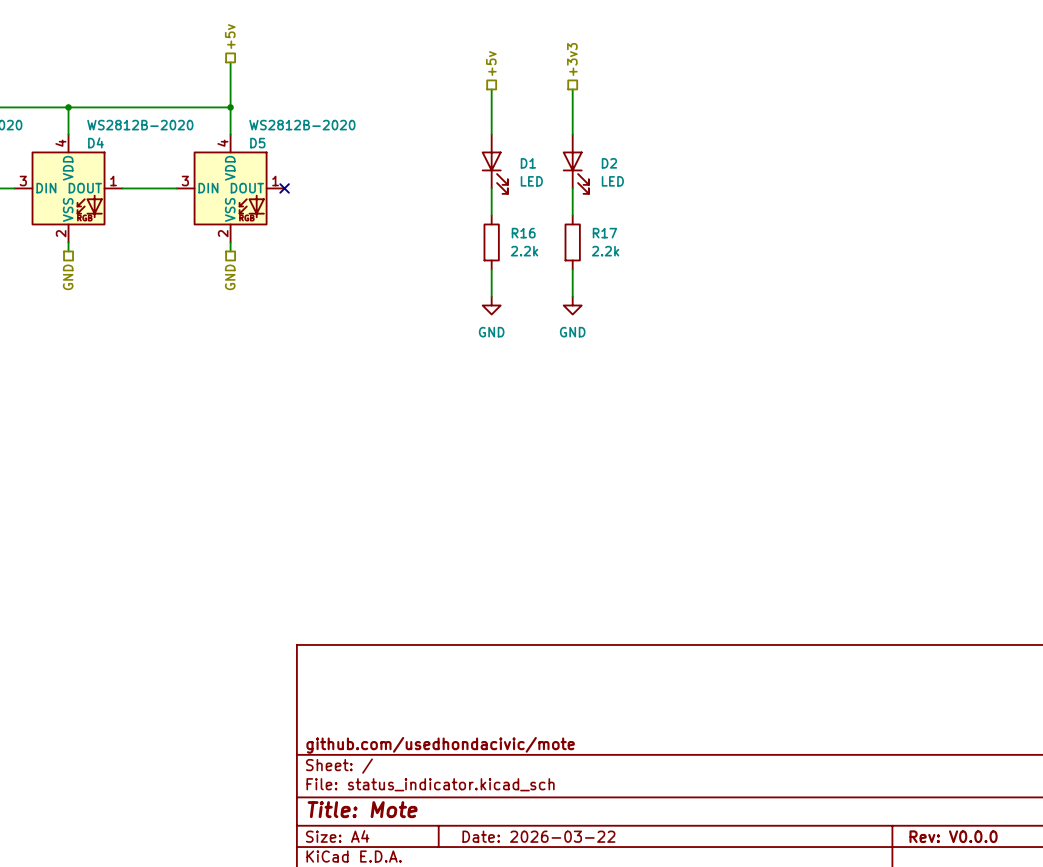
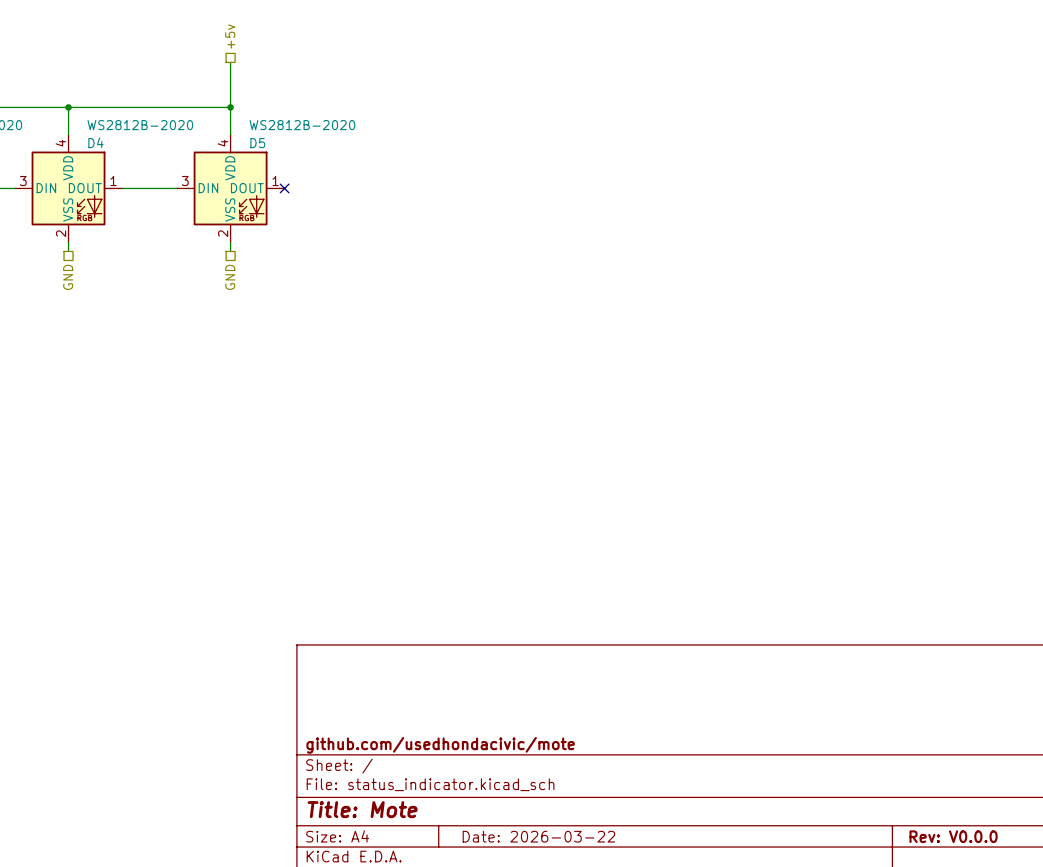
hierarchical label: +3v3 (572, 59) -> none
hierarchical label: +5v (491, 63) -> none
wire: (491, 89) (491, 134) -> none
wire: (572, 89) (572, 134) -> none
D1: LED (494, 164) -> none
D2: LED (575, 164) -> none
wire: (491, 188) (491, 215) -> none
wire: (572, 188) (572, 215) -> none
R16: 2.2k (491, 242) -> none
R17: 2.2k (572, 242) -> none
wire: (491, 269) (491, 296) -> none
wire: (572, 269) (572, 296) -> none
power symbol: GND (491, 305) -> none
power symbol: GND (572, 305) -> none

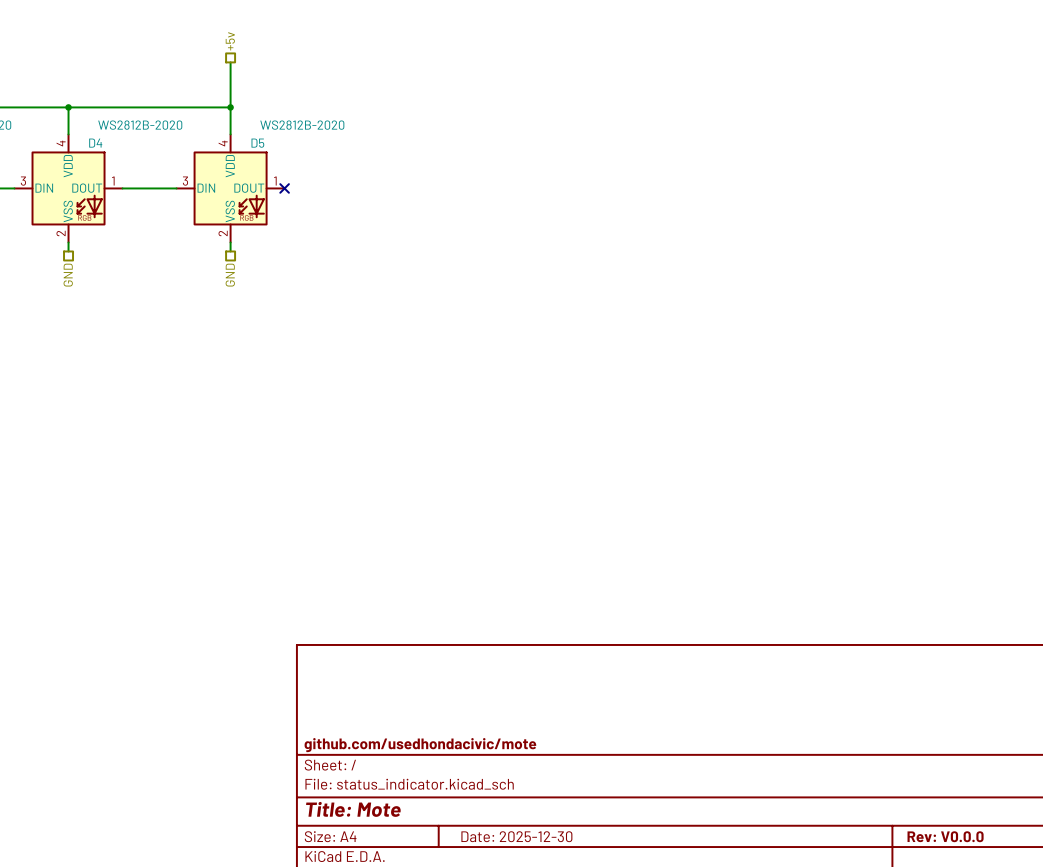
title block: Date: 2026-03-22 (538, 836) -> Date: 2025-12-30 (516, 836)

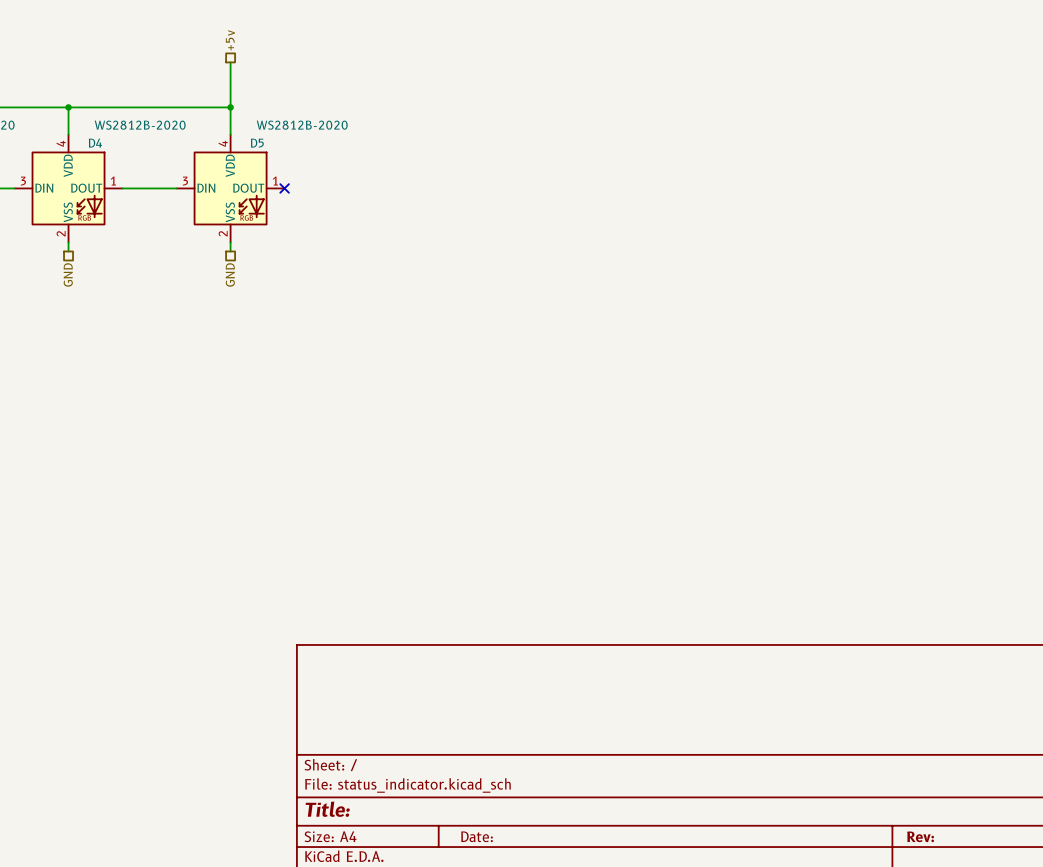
title block: github.com/usedhondacivic/mote (420, 745) -> none
title block: Title: Mote (353, 809) -> Title: (327, 809)
title block: Date: 2025-12-30 (516, 836) -> Date: (477, 836)
title block: Rev: V0.0.0 (945, 836) -> Rev: (920, 836)

